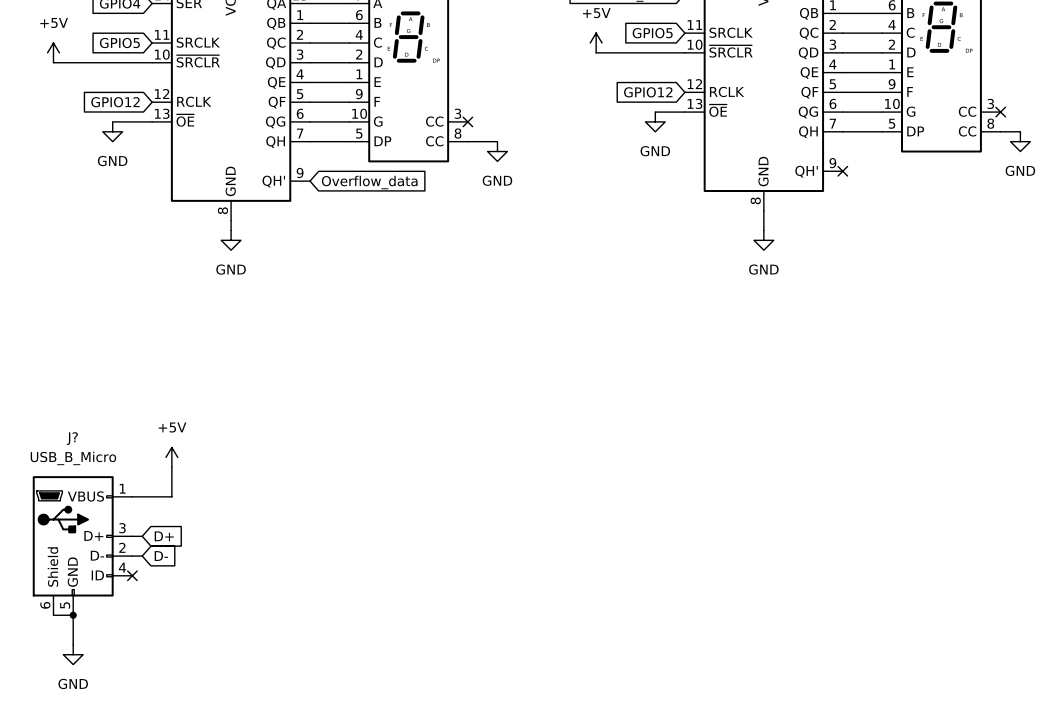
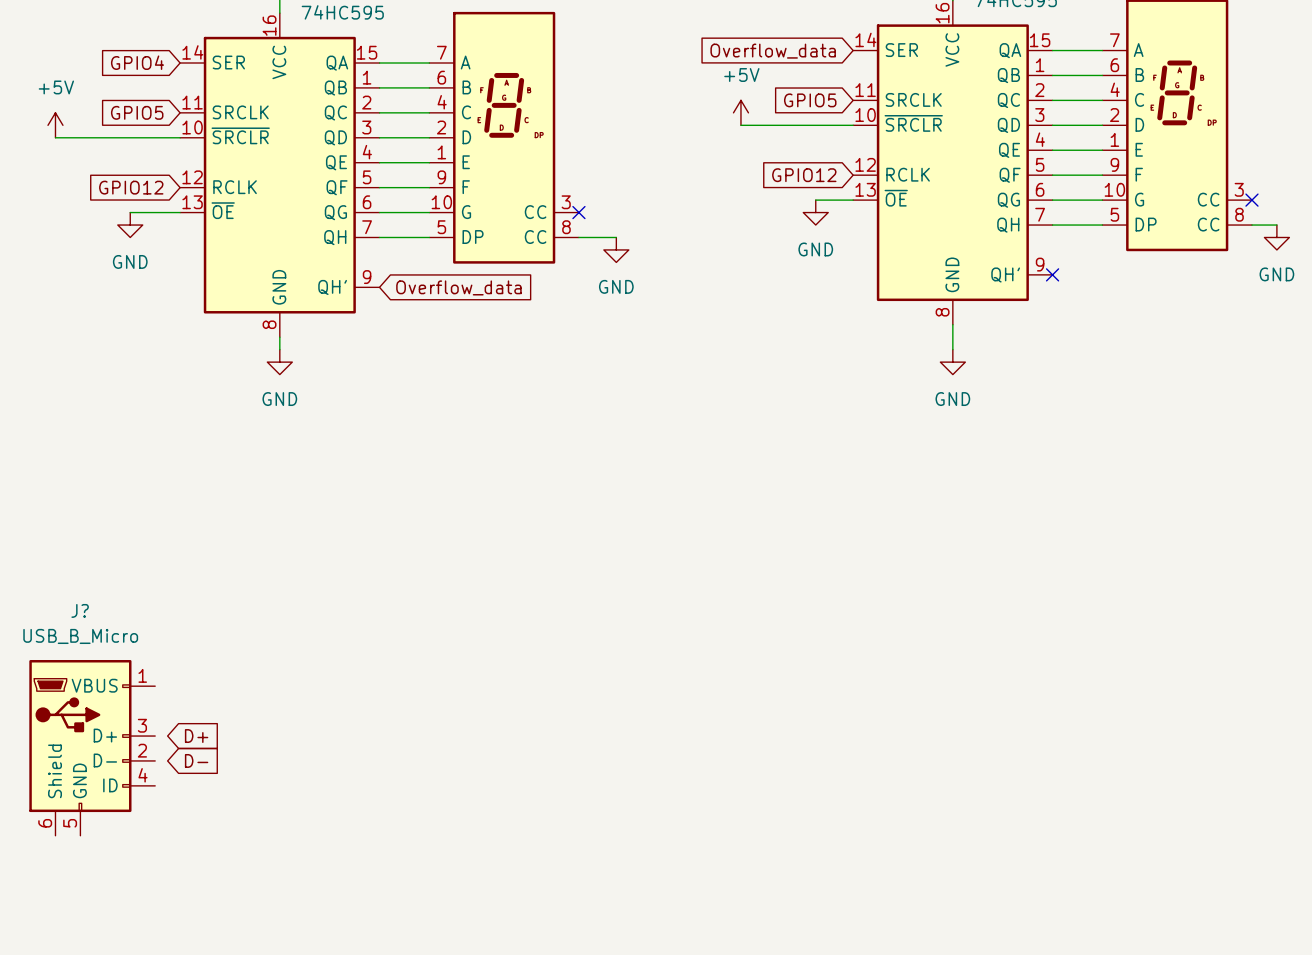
power symbol: +5V (171, 457) -> none
wire: (171, 467) (171, 496) (132, 496) -> none
wire: (132, 536) (142, 536) -> none
wire: (132, 556) (142, 556) -> none
no-connect mark: (132, 575) -> none
wire: (53, 615) (73, 615) (73, 644) -> none
junction: (73, 615) -> none
power symbol: GND (73, 654) -> none

